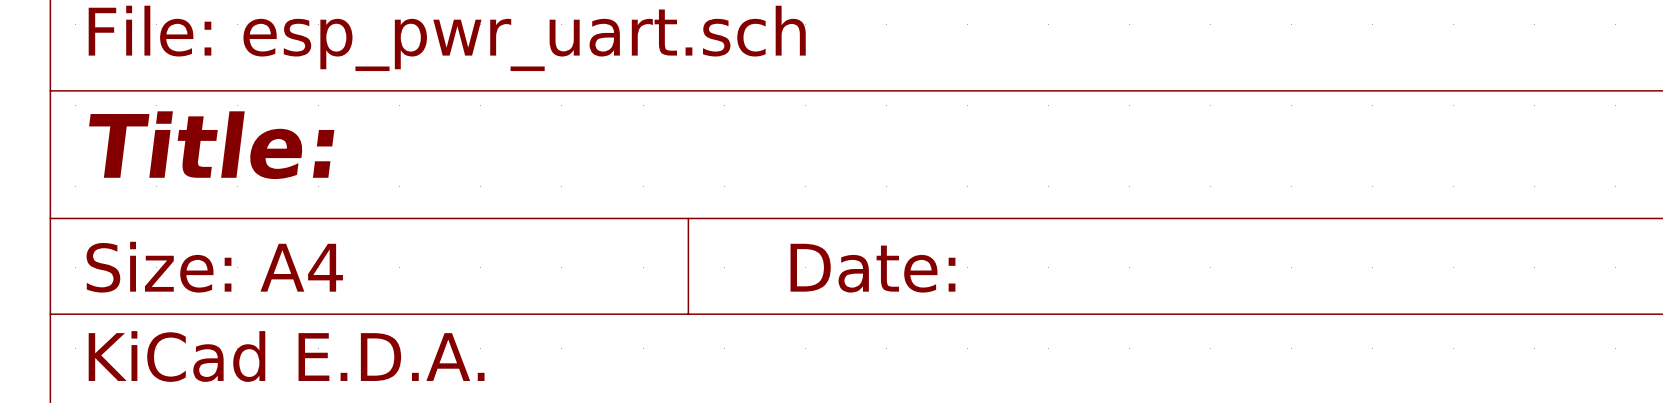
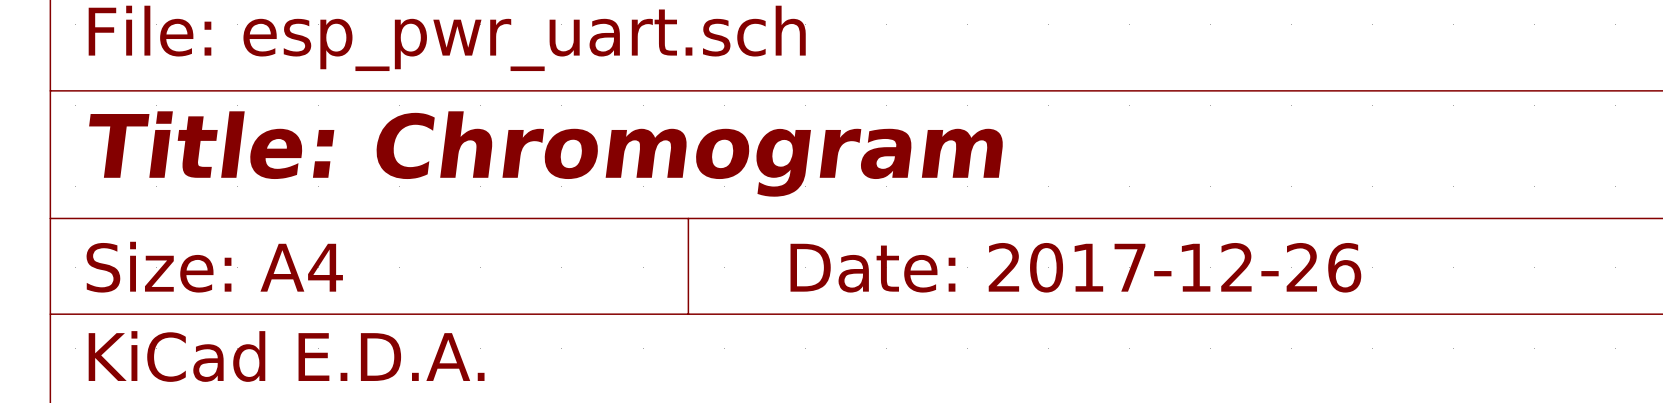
title block: Title: (211, 145) -> Title: Chromogram (546, 154)
title block: Date: (872, 268) -> Date: 2017-12-26 (1075, 267)

